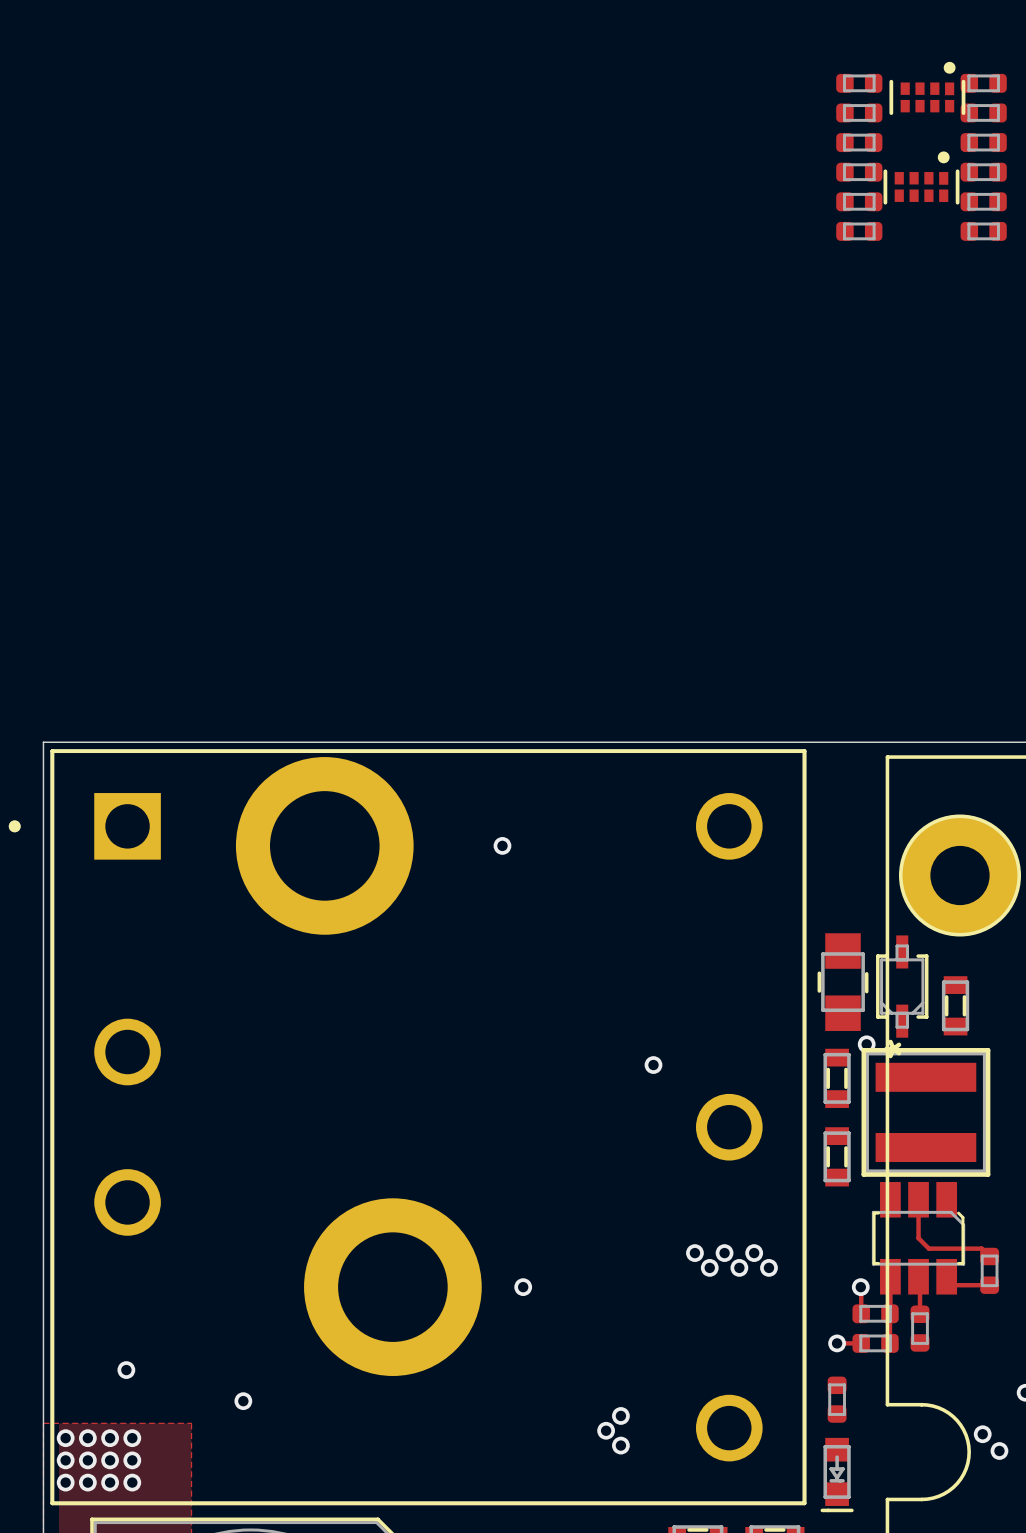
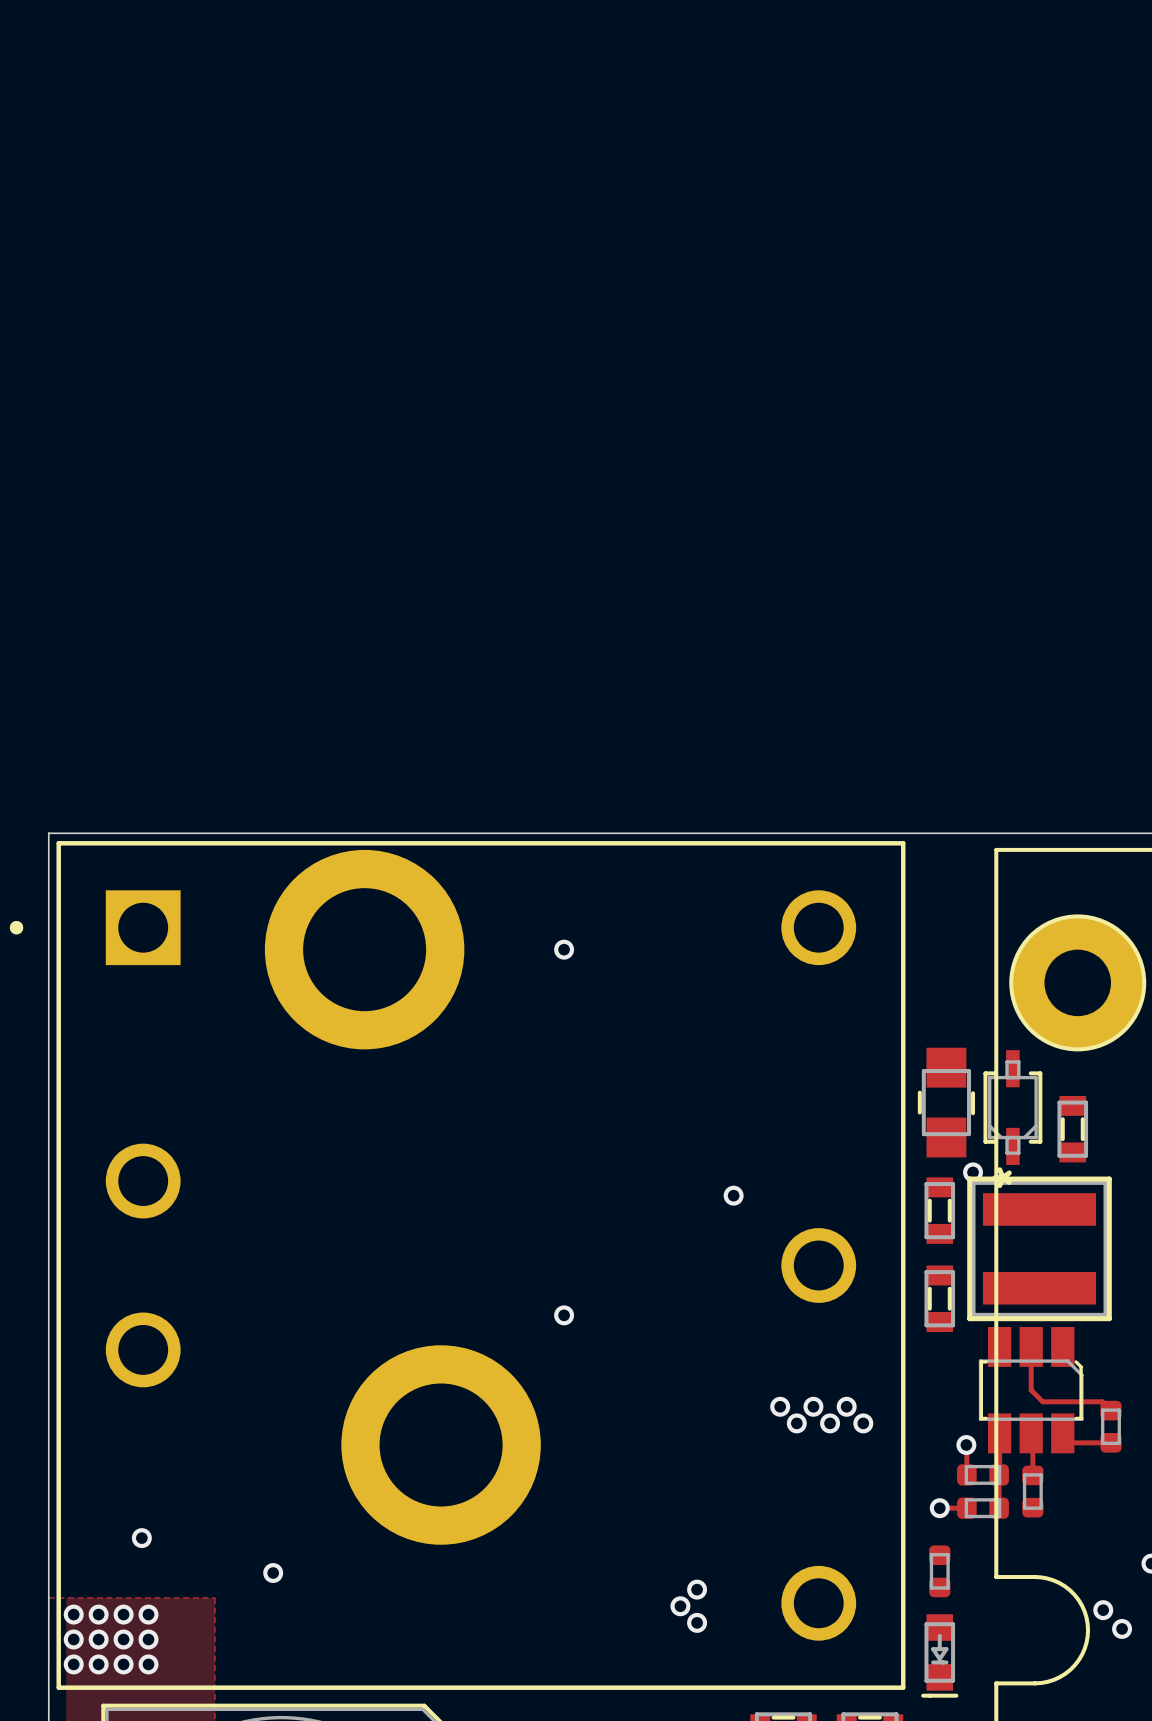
part: (859, 83) -> none
part: (983, 83) -> none
part: (927, 88) -> none
part: (859, 112) -> none
part: (983, 112) -> none
part: (859, 142) -> none
part: (983, 142) -> none
part: (859, 172) -> none
part: (983, 172) -> none
part: (921, 178) -> none
part: (859, 201) -> none
part: (983, 201) -> none
part: (859, 231) -> none
part: (983, 231) -> none
via position: (523, 1287) -> (564, 1315)

